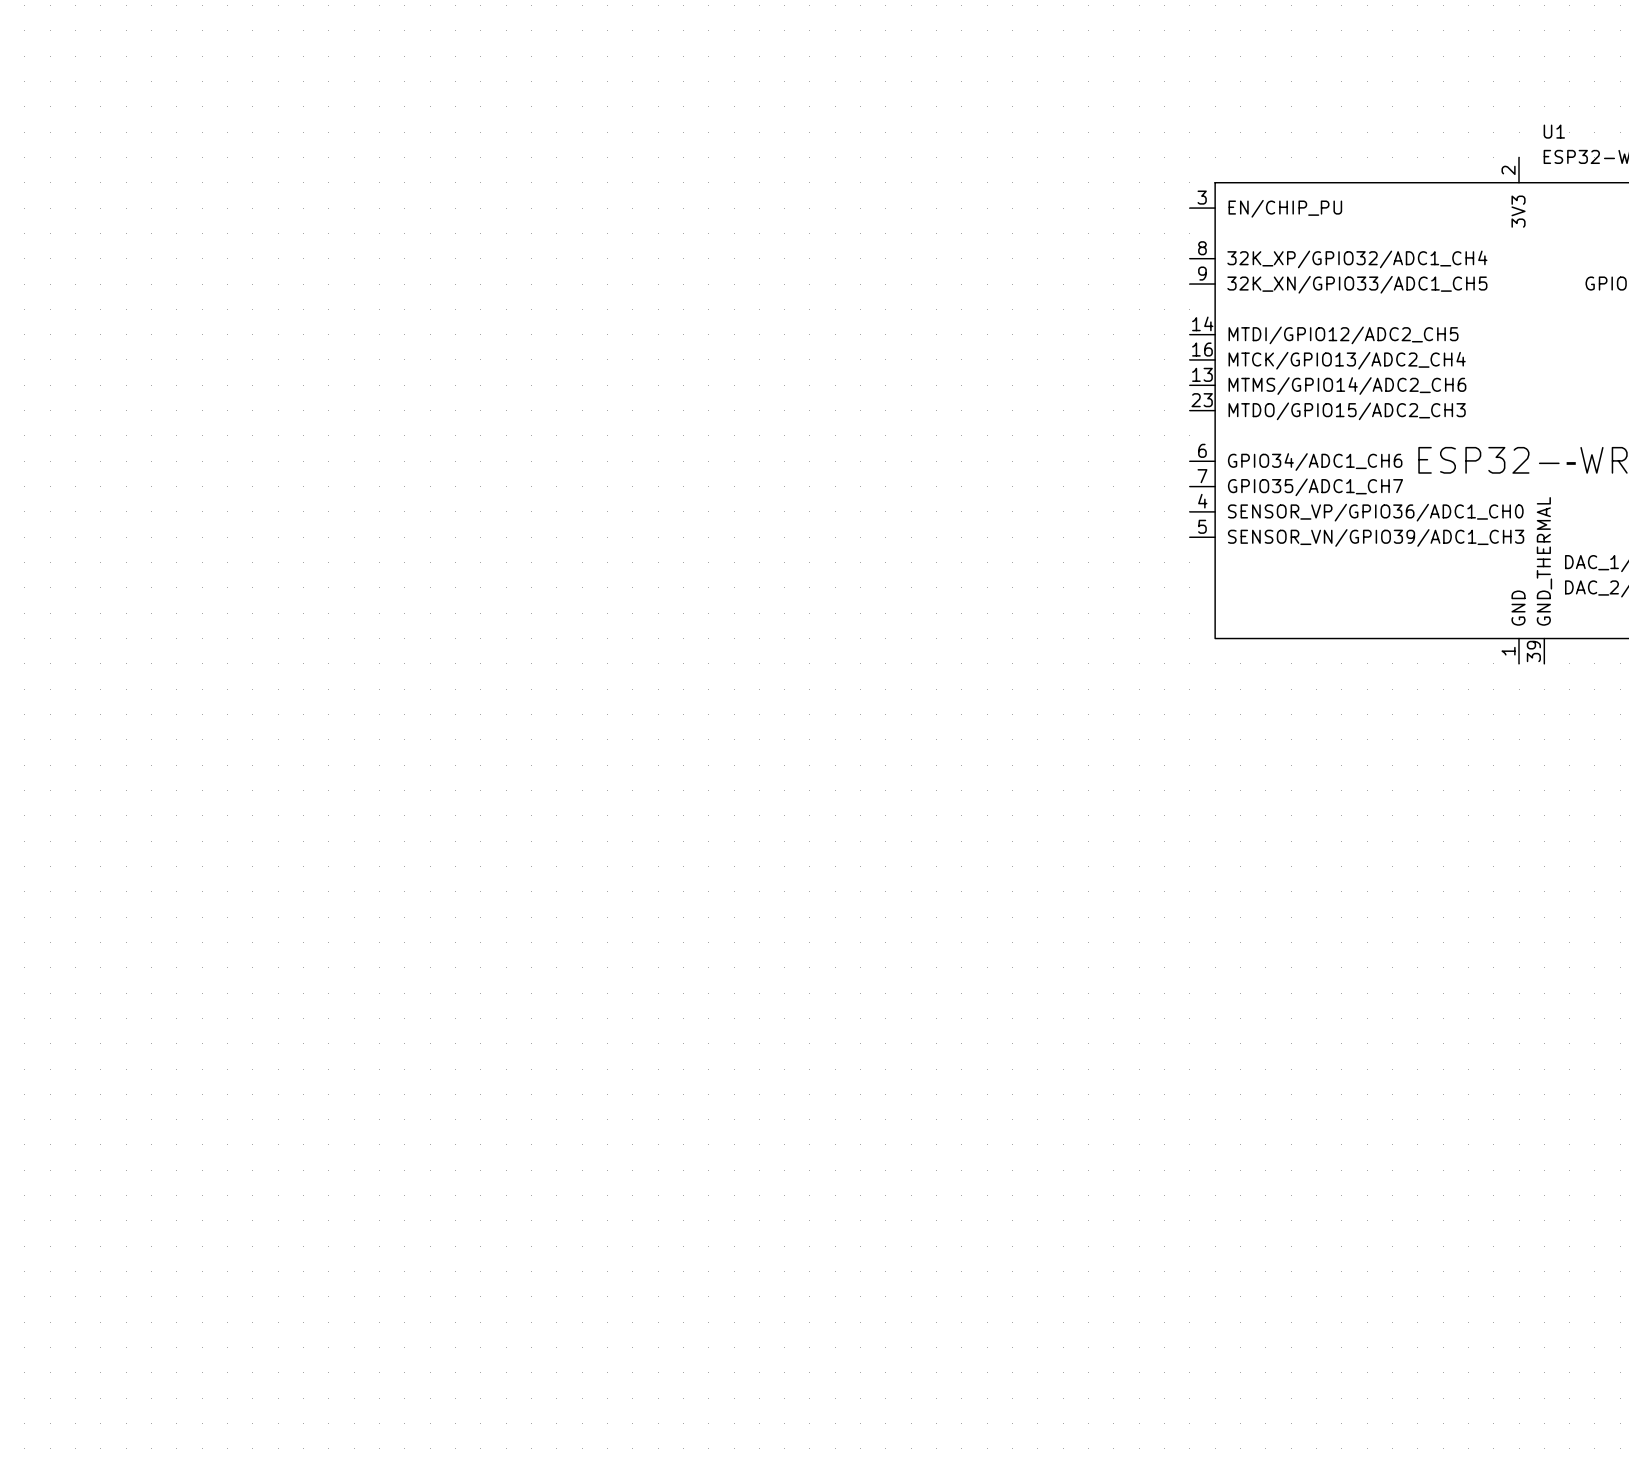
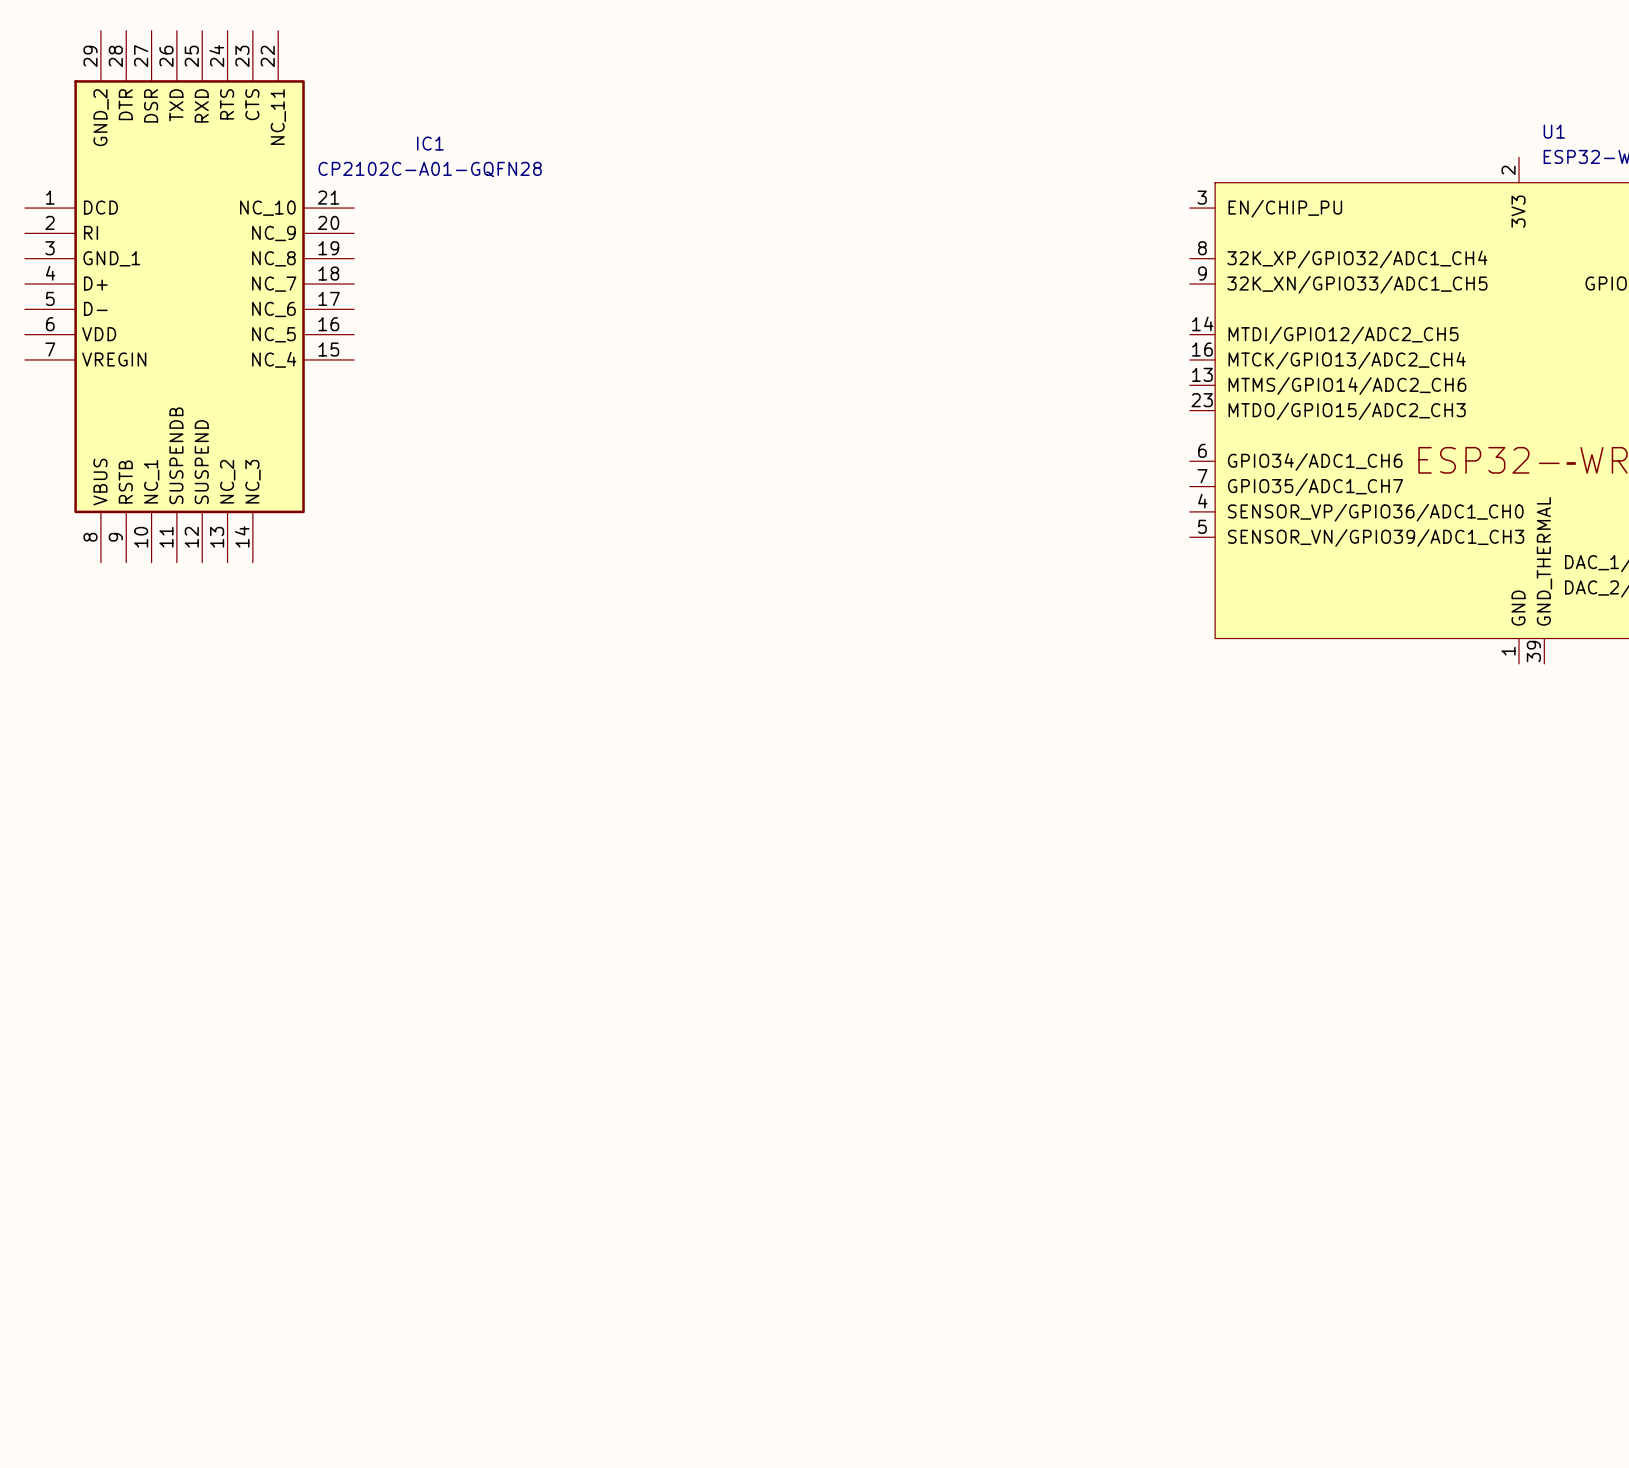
IC1: none -> CP2102C-A01-GQFN28 (189, 296)

